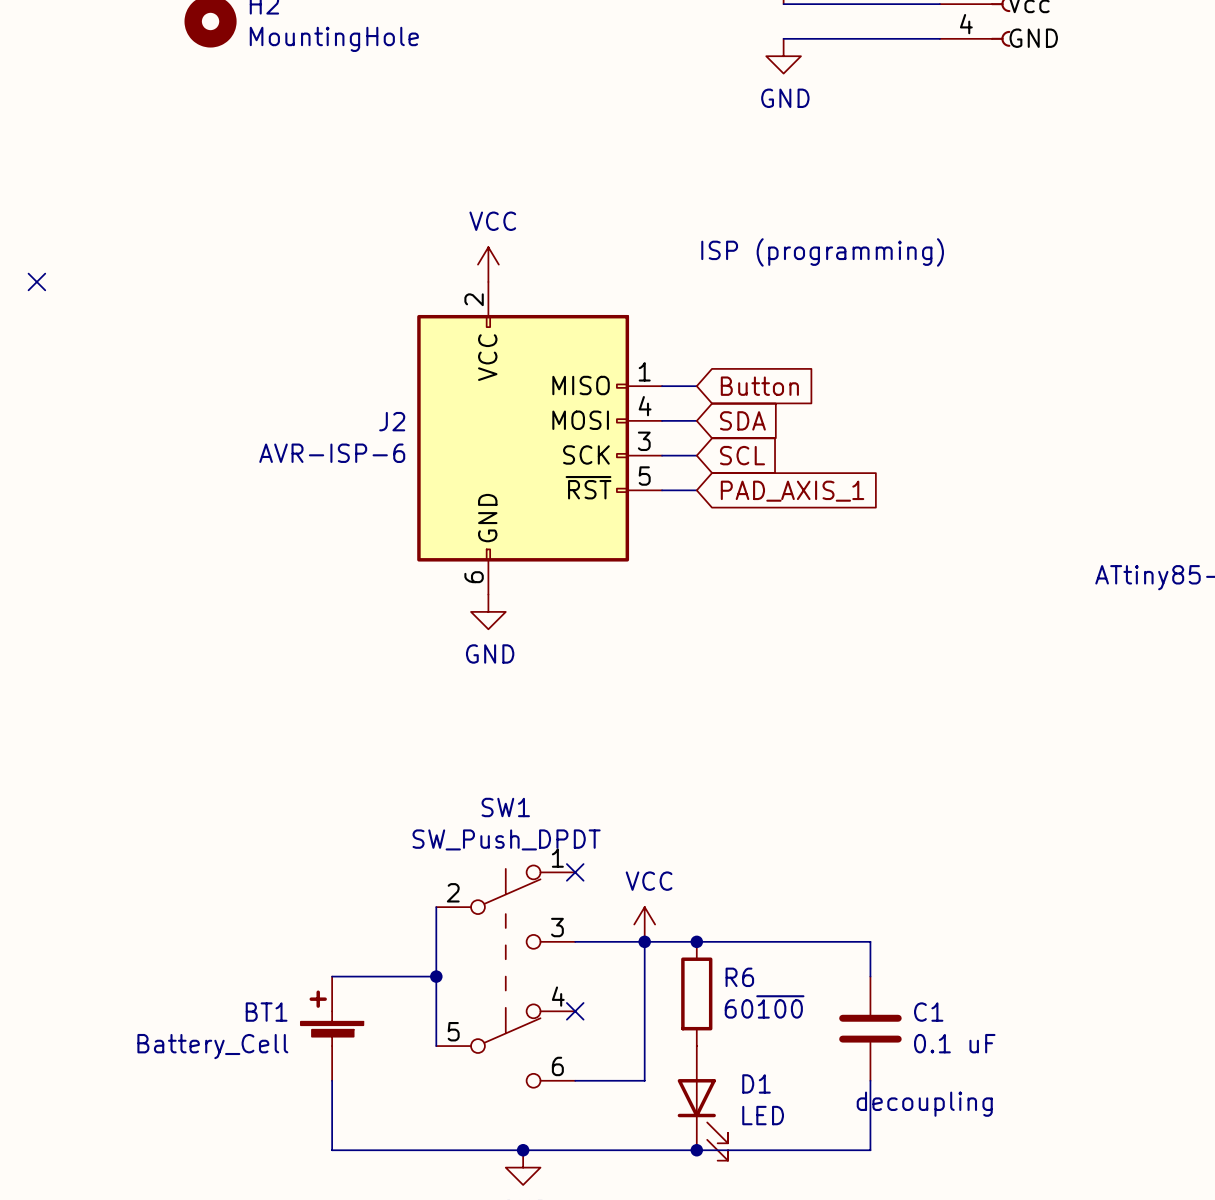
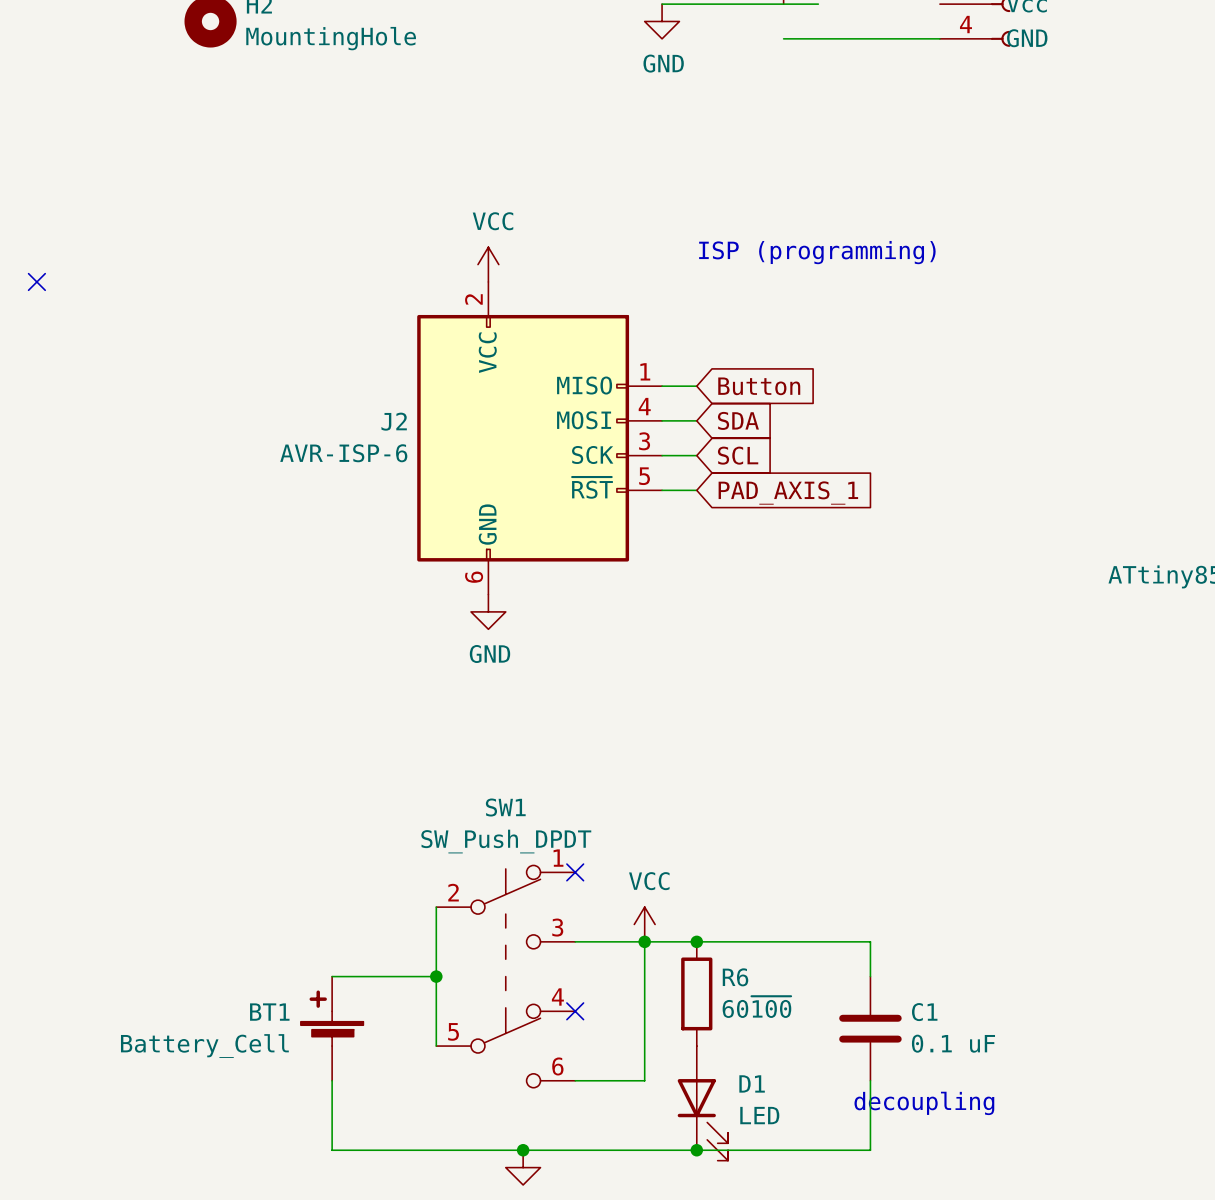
wire: (818, 4) (939, 4) -> (662, 4) (783, 4)
power symbol position: GND (783, 56) -> GND (662, 21)

